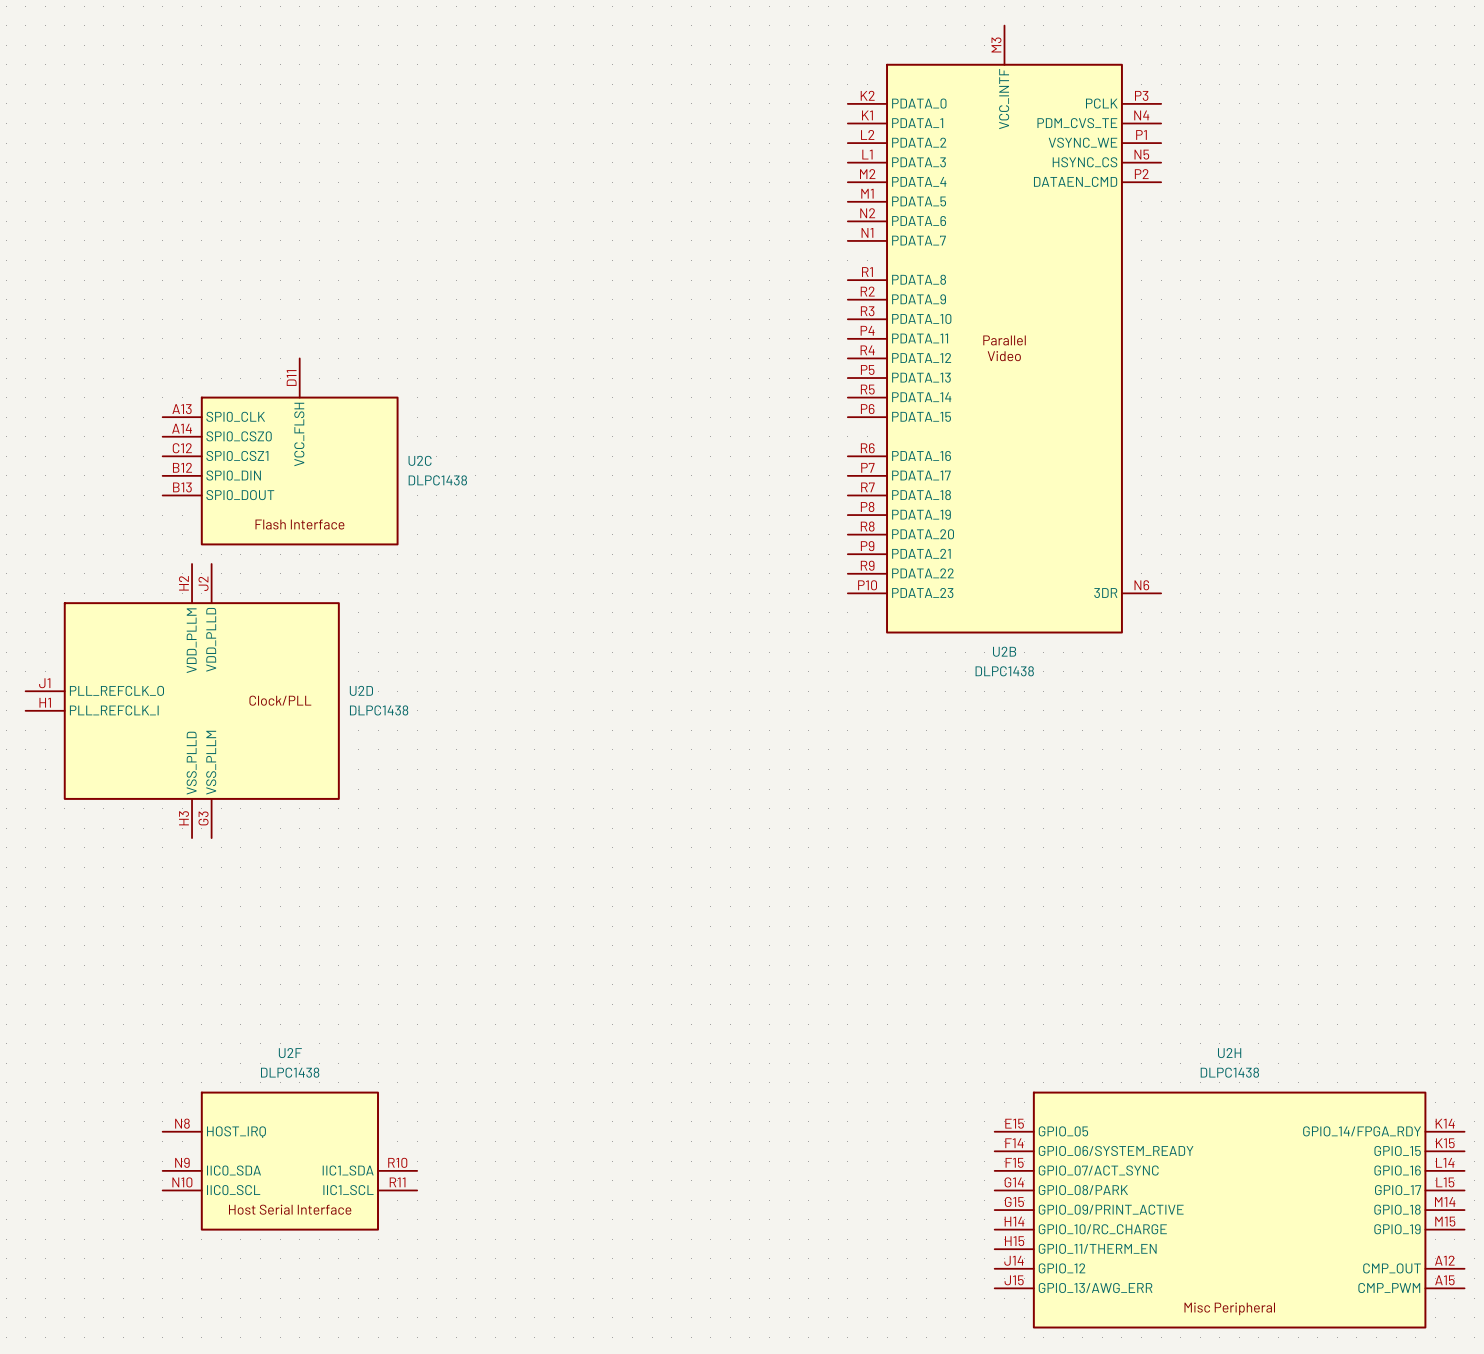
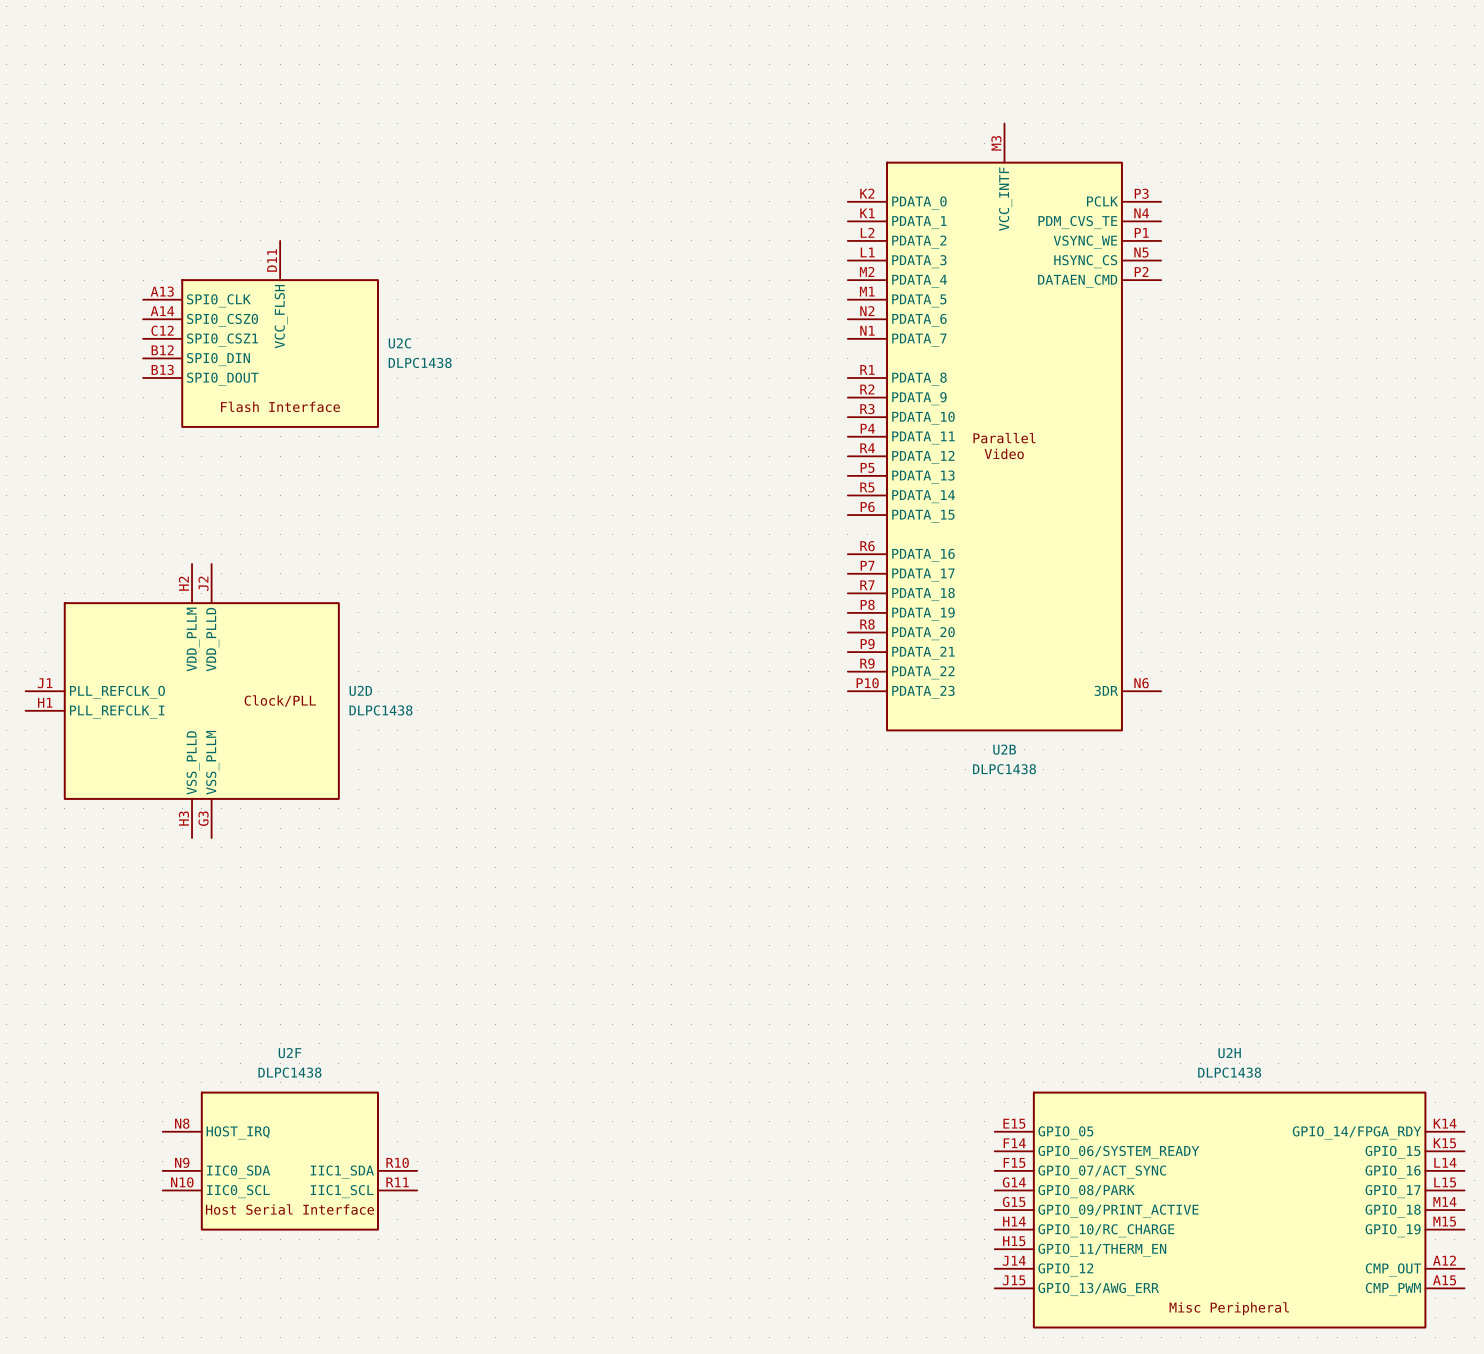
U2B position: (1004, 329) -> (1004, 427)
U2C position: (280, 451) -> (261, 334)

